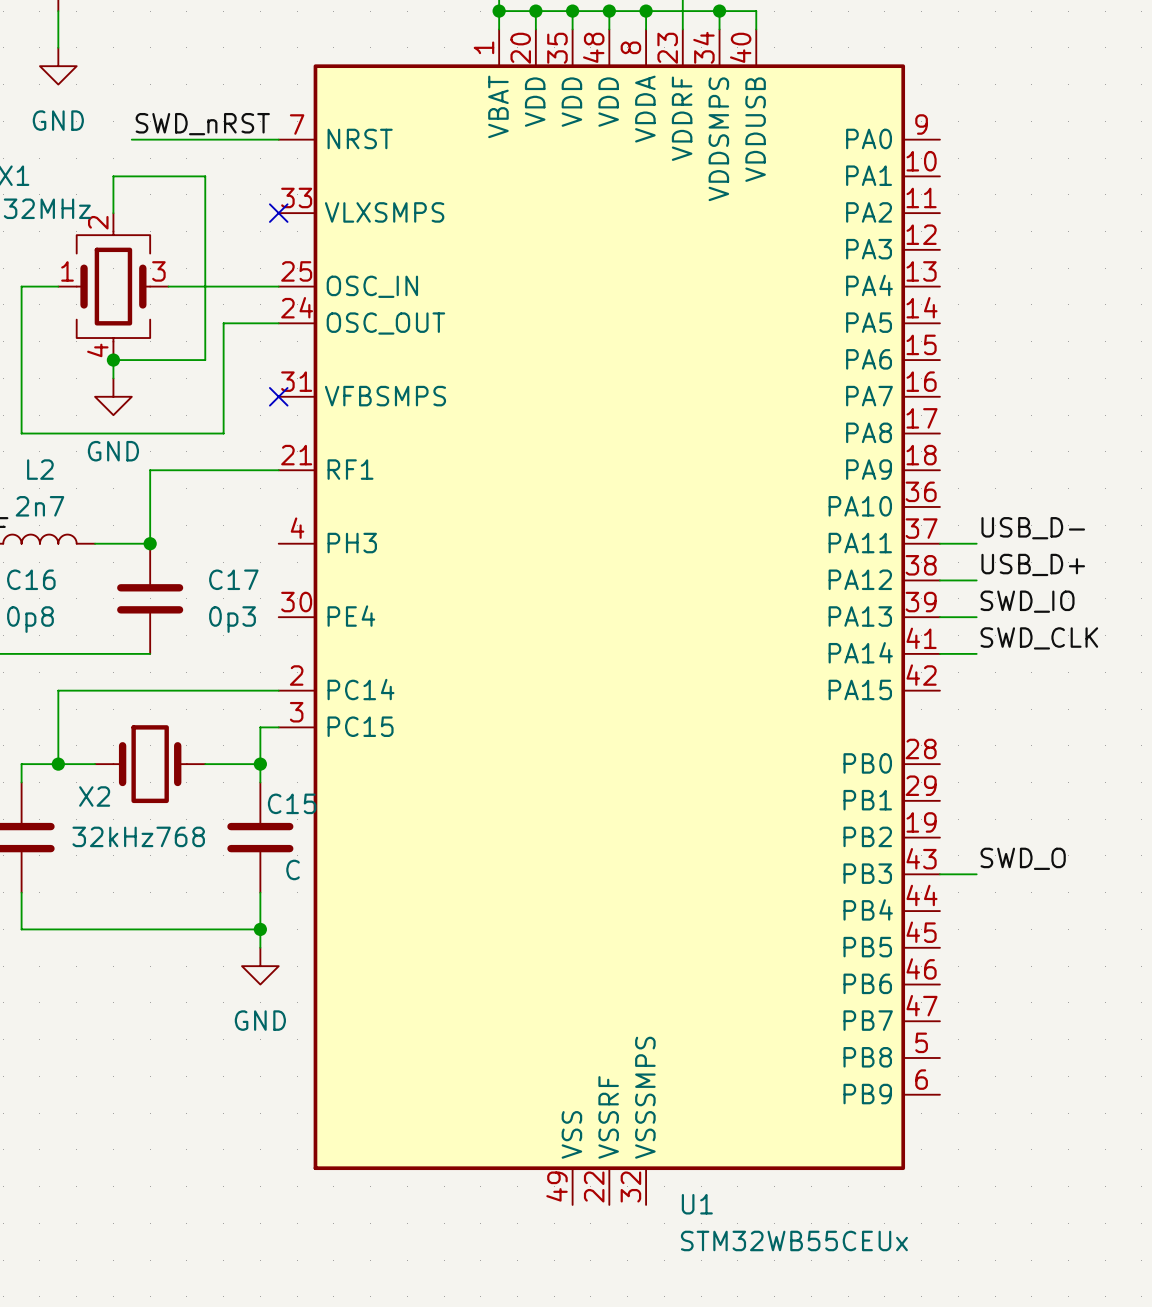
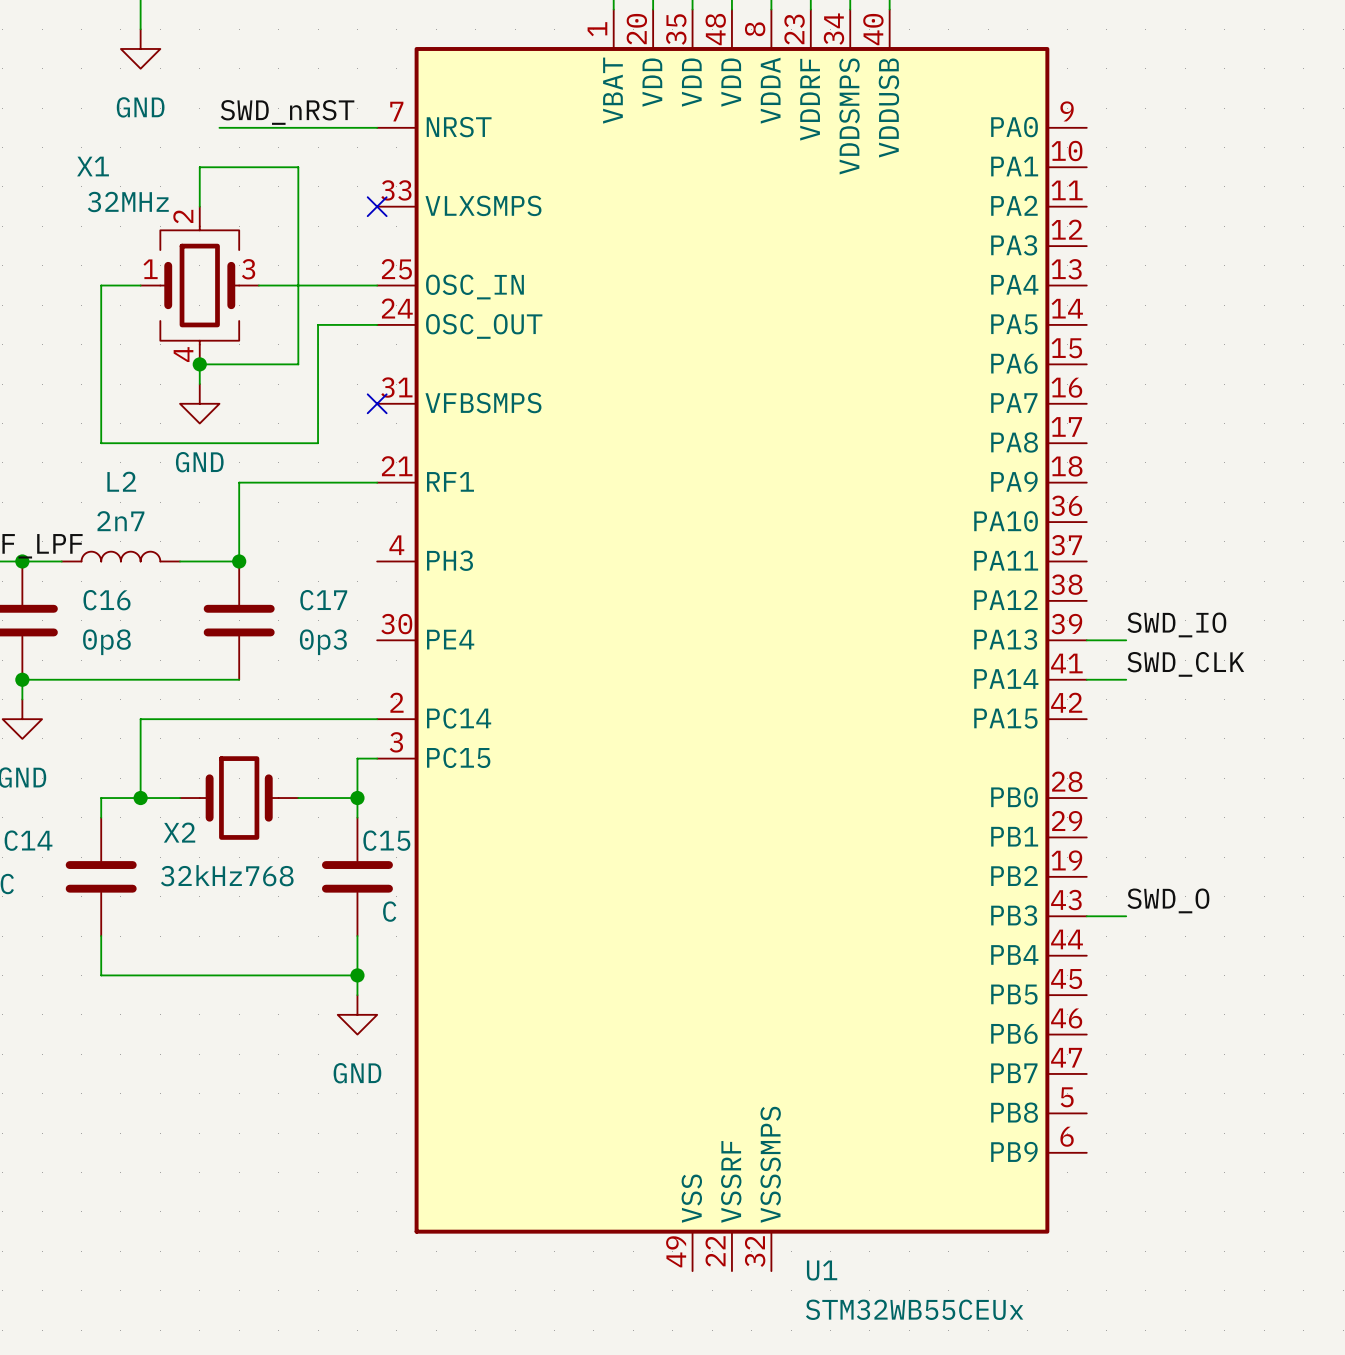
label: USB_D- (1033, 528) -> none
wire: (939, 543) (976, 543) -> none
label: USB_D+ (1033, 564) -> none
wire: (939, 580) (976, 580) -> none

